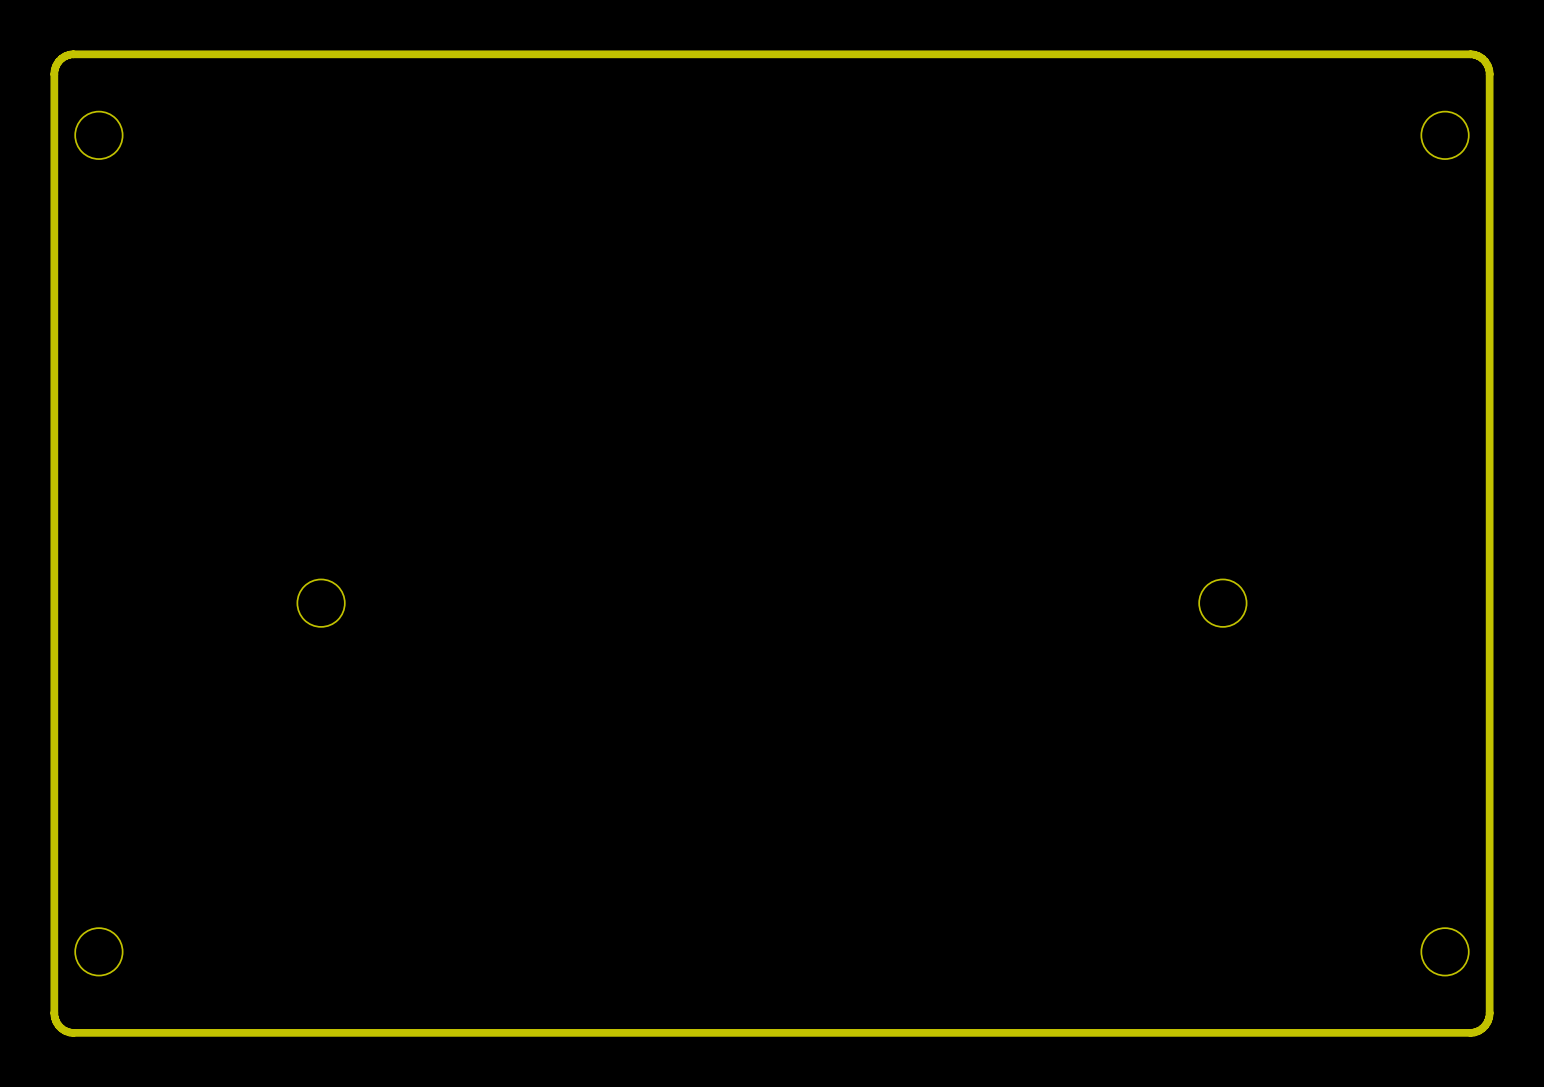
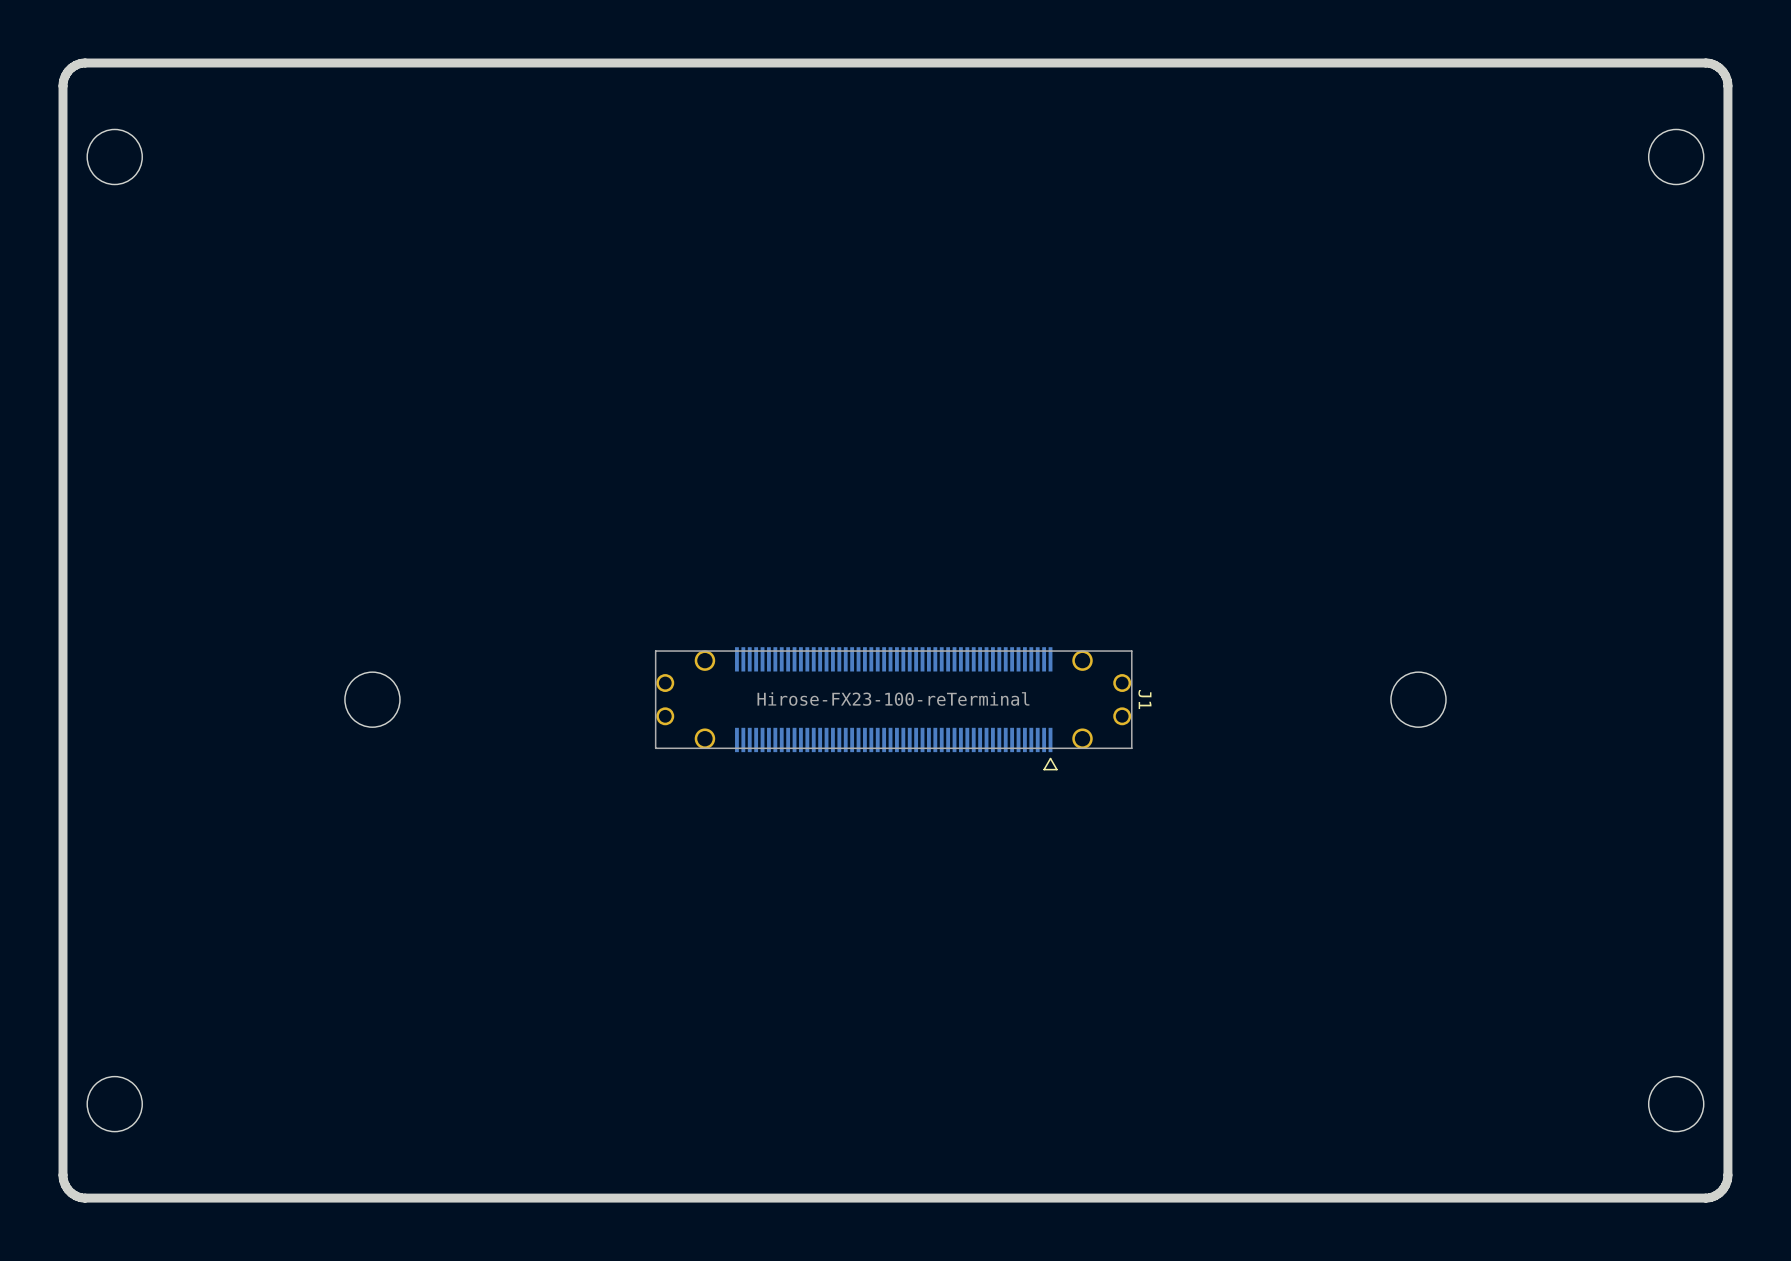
J1: none -> Hirose-FX23-100-reTerminal (893, 708)

